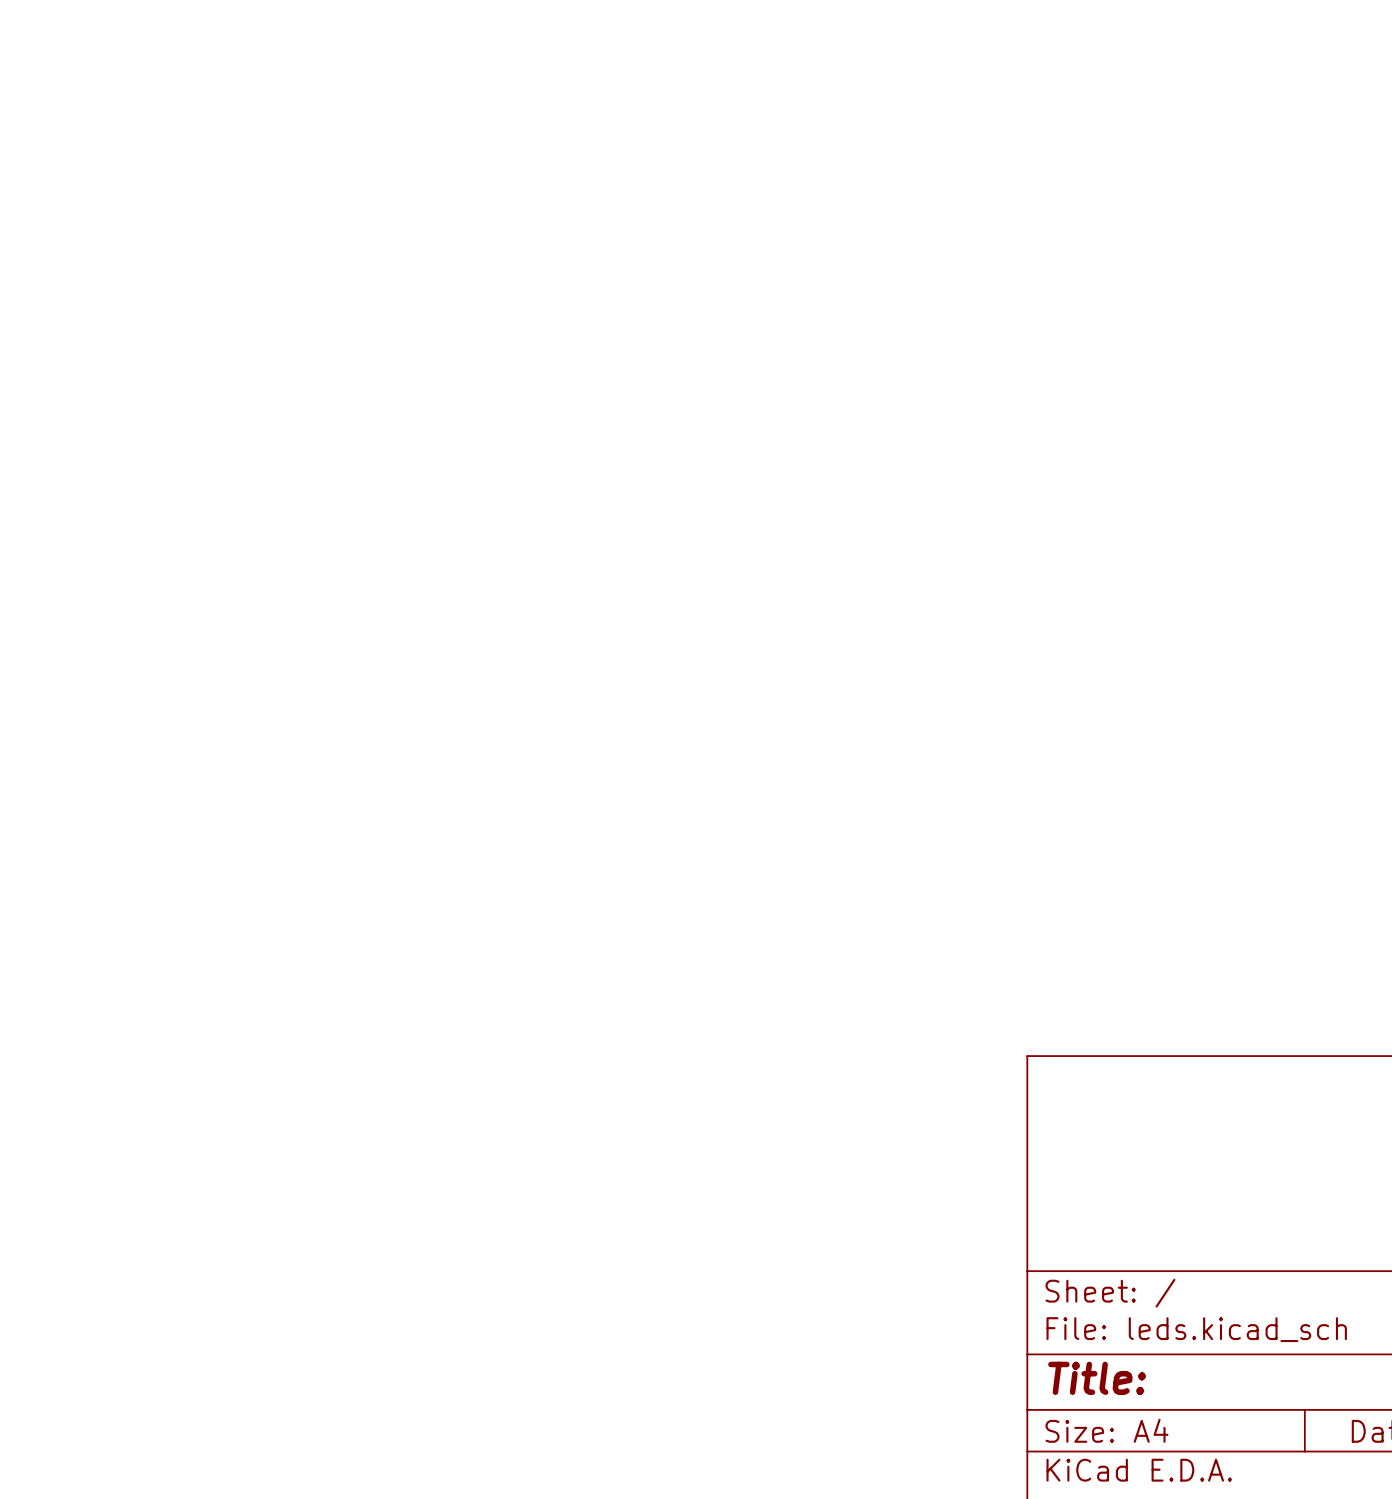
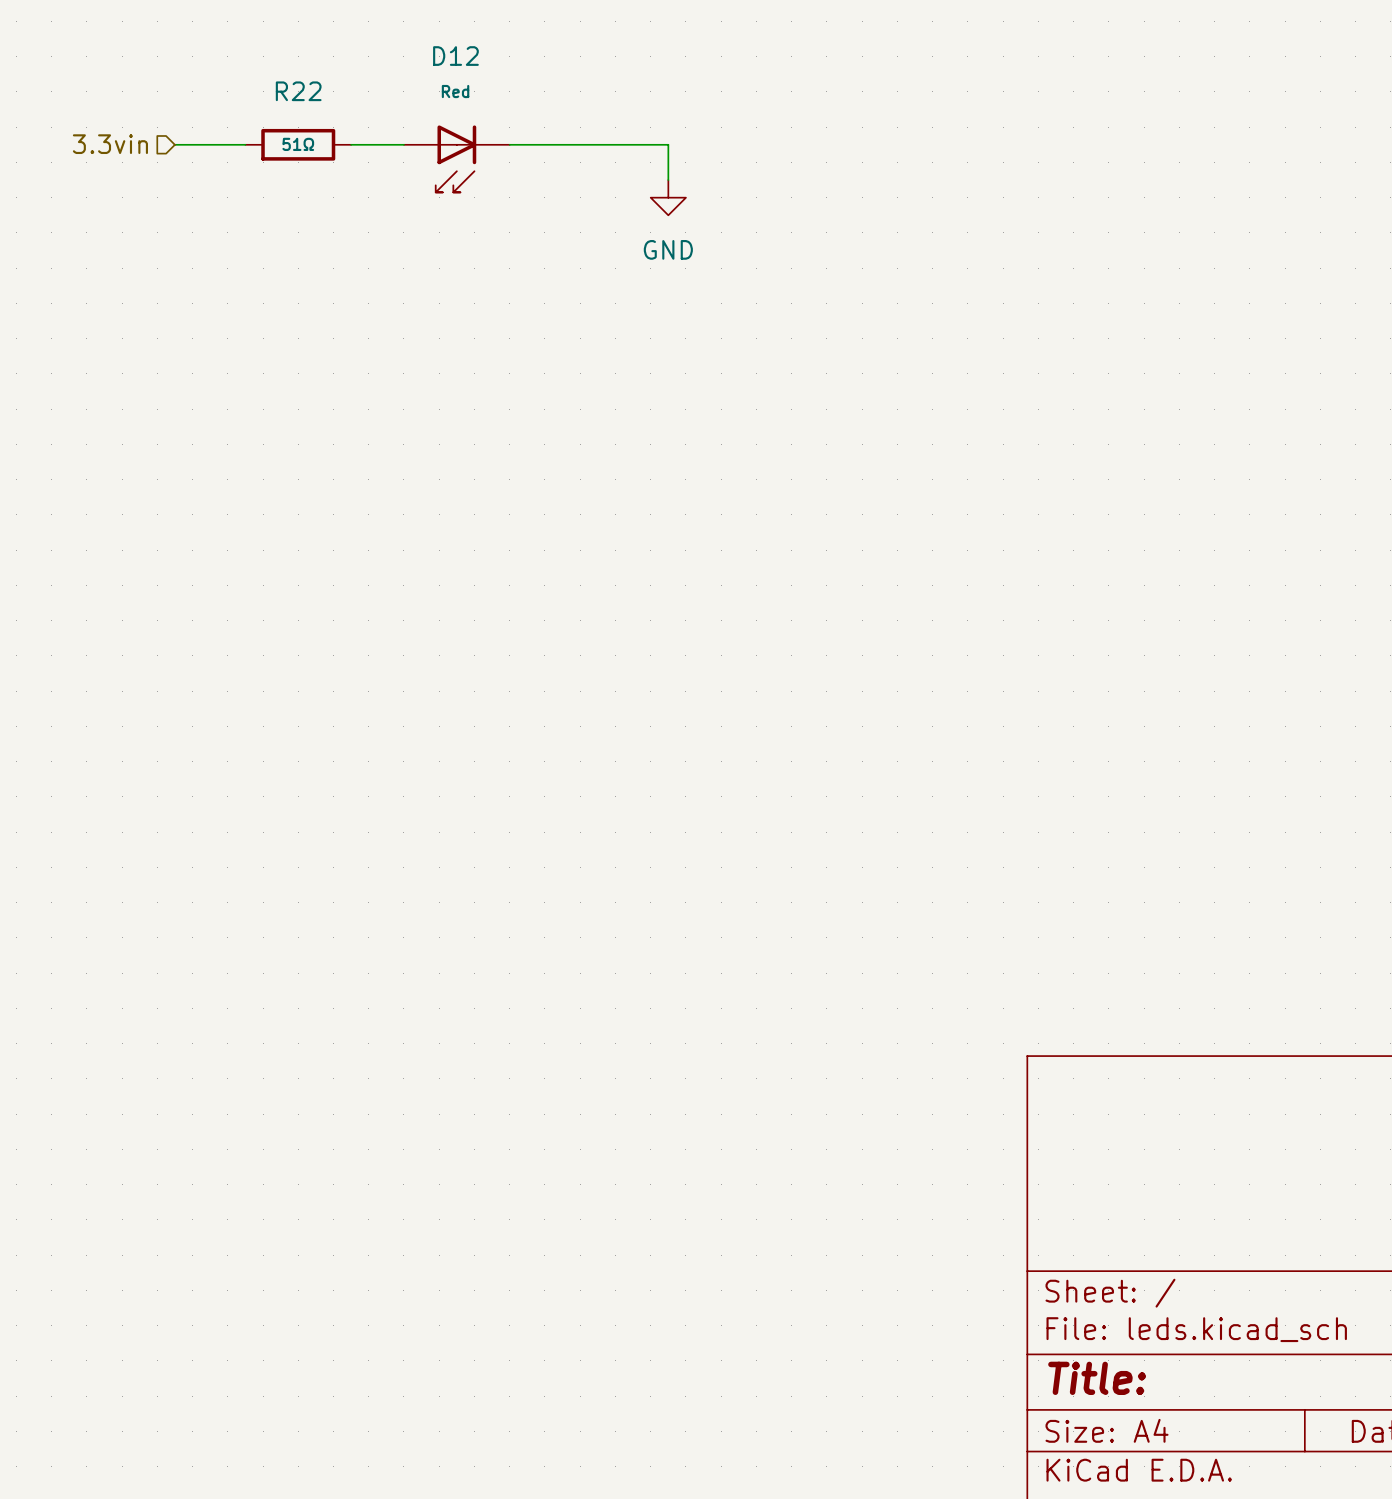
hierarchical label: none -> 3.3vin (110, 144)
wire: none -> (174, 144) (245, 144)
R22: none -> 51Ω (298, 144)
wire: none -> (351, 144) (403, 144)
wire: none -> (509, 144) (668, 144) (668, 180)
D12: none -> Red (456, 159)
power symbol: none -> GND (668, 197)

